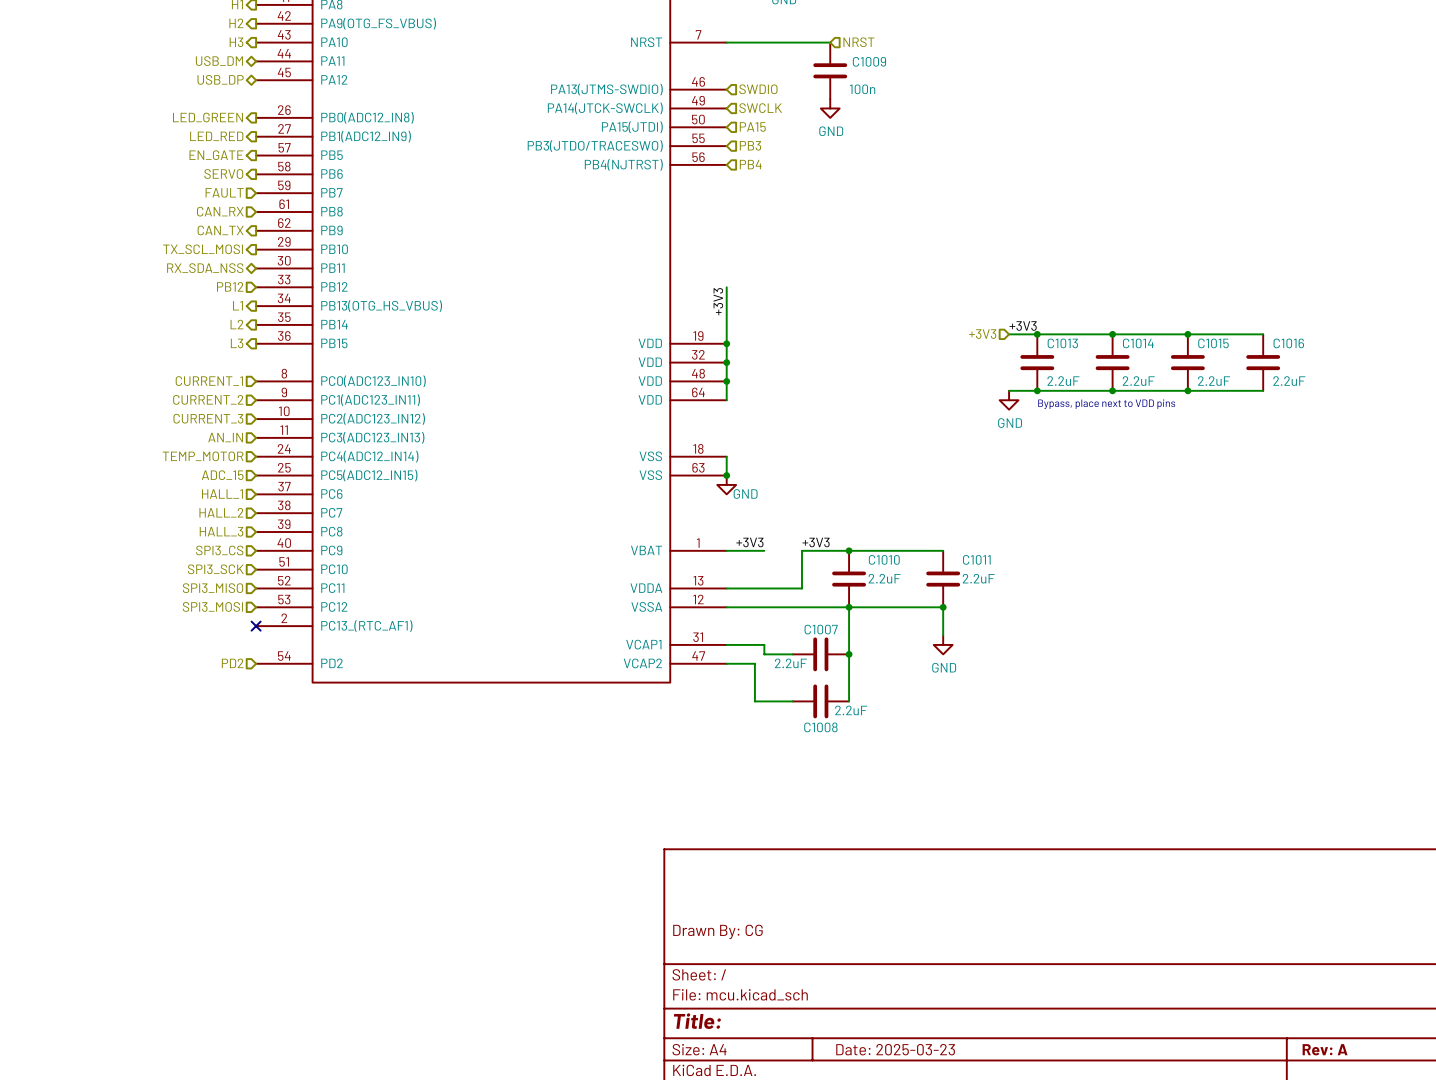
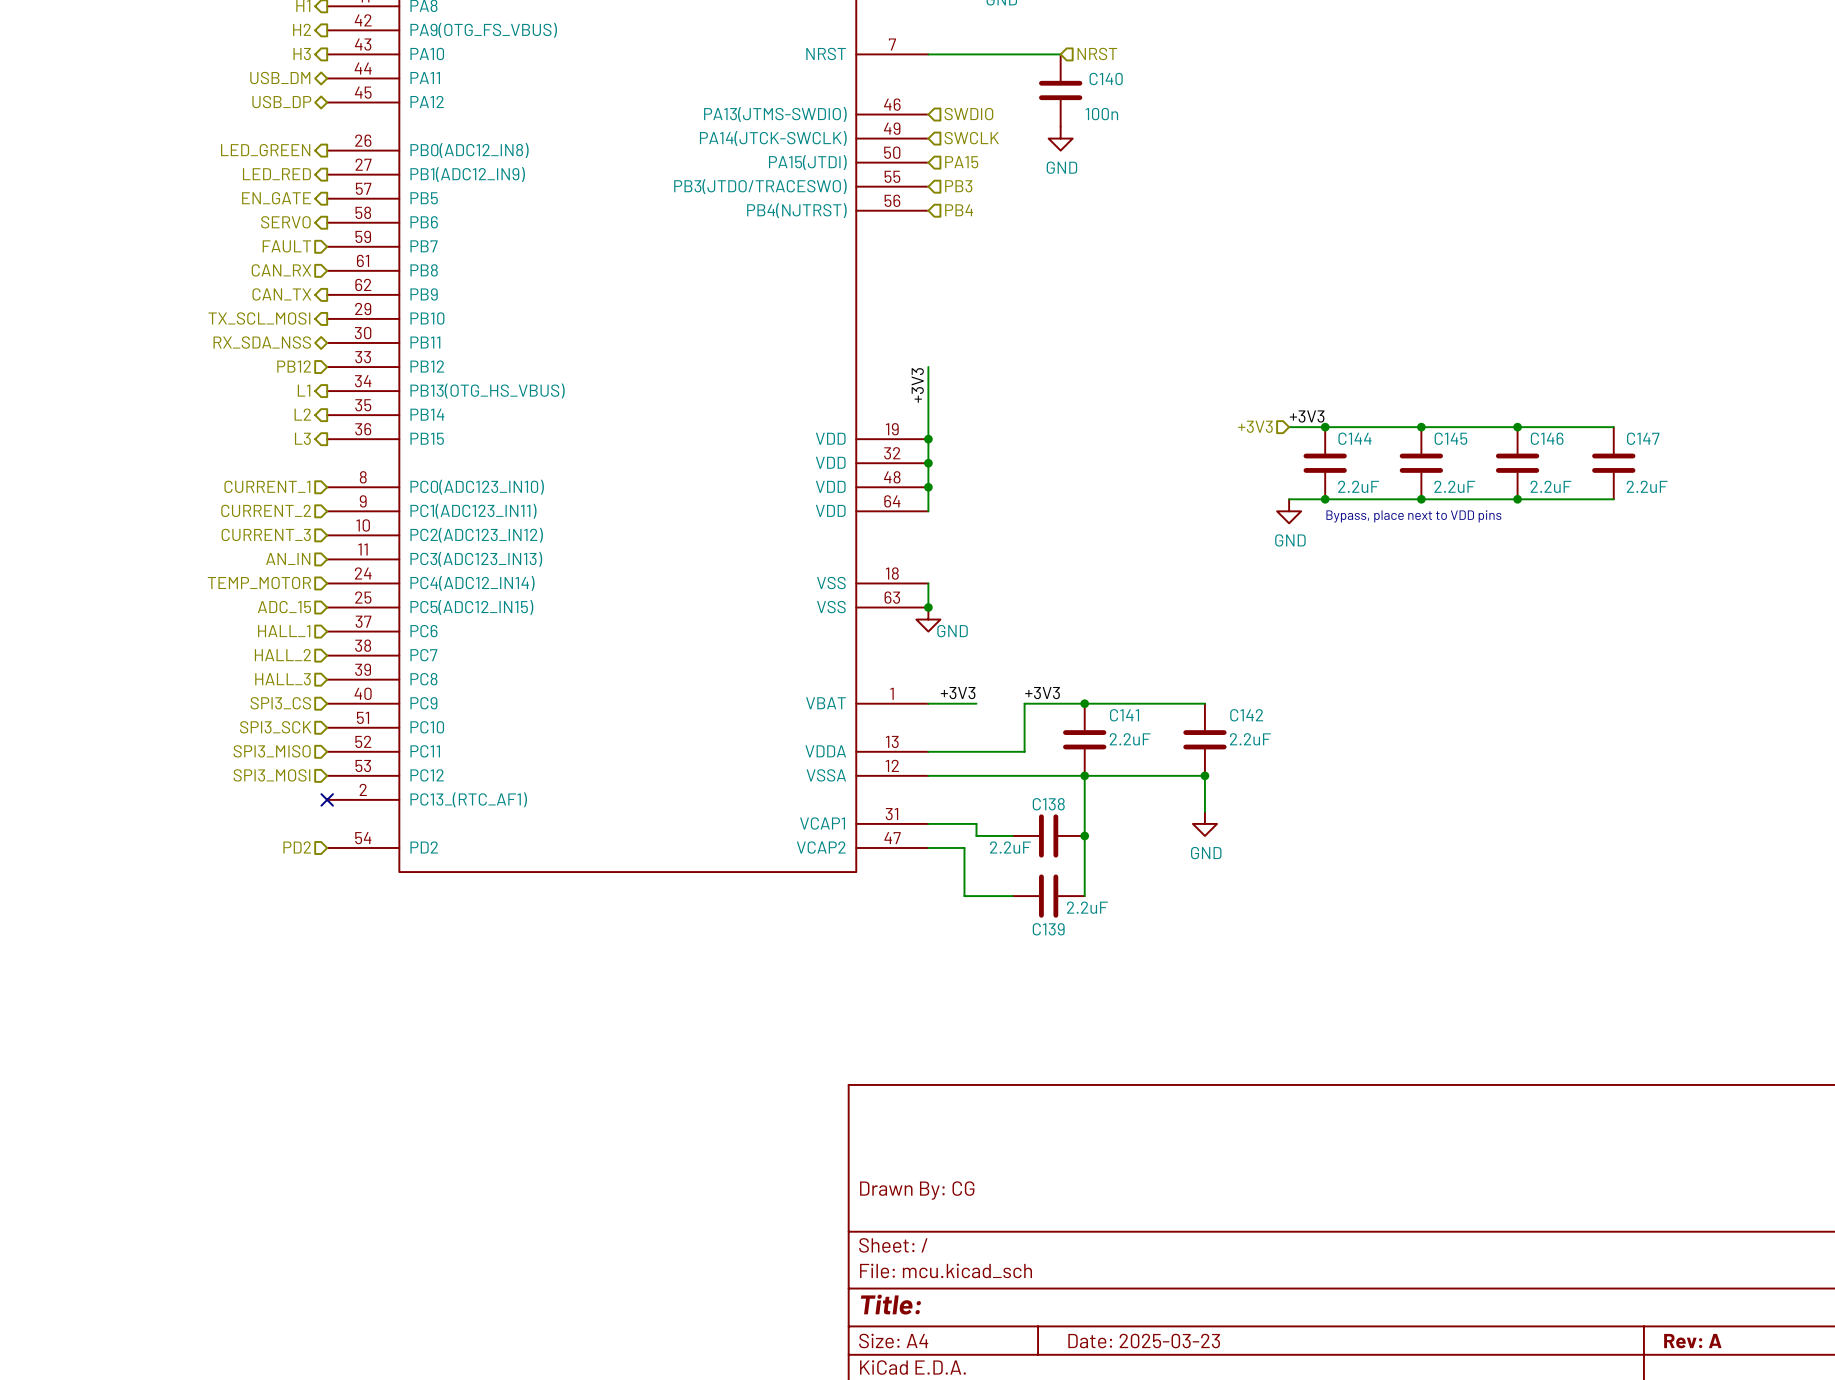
C1009 name: C1009 (869, 61) -> C140 (1106, 78)
C1013 name: C1013 (1062, 343) -> C144 (1354, 438)
C1014 name: C1014 (1138, 343) -> C145 (1450, 438)
C1015 name: C1015 (1213, 343) -> C146 (1547, 438)
C1016 name: C1016 (1288, 343) -> C147 (1643, 438)
C1010 name: C1010 (884, 559) -> C141 (1124, 715)
C1011 name: C1011 (976, 559) -> C142 (1246, 715)
C1007 name: C1007 (821, 629) -> C138 (1048, 804)
C1008 name: C1008 (820, 727) -> C139 (1048, 929)

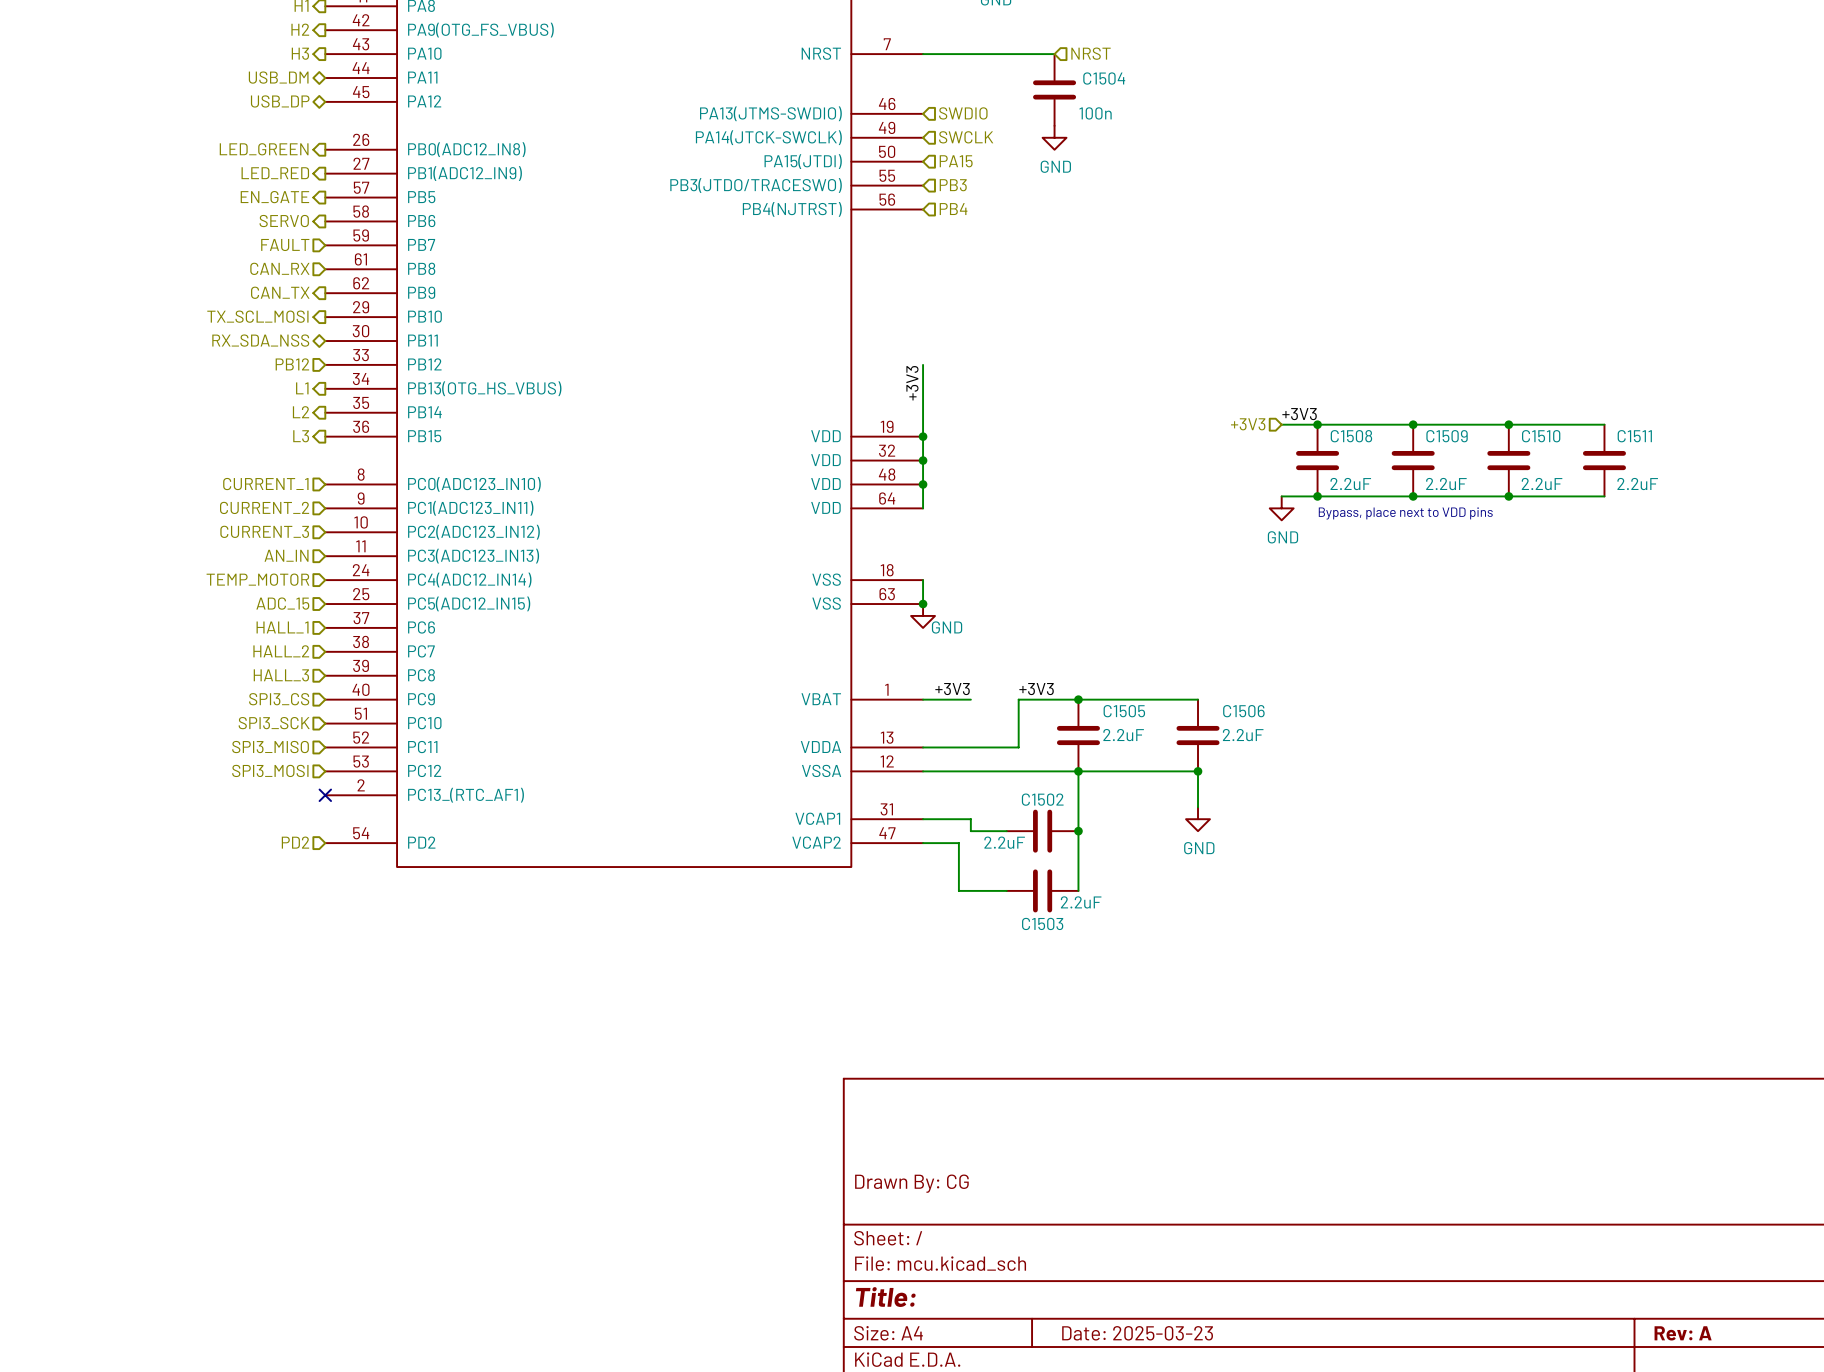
C140 name: C140 (1106, 78) -> C1504 (1104, 78)
C144 name: C144 (1354, 438) -> C1508 (1351, 436)
C145 name: C145 (1450, 438) -> C1509 (1447, 436)
C146 name: C146 (1547, 438) -> C1510 (1541, 436)
C147 name: C147 (1643, 438) -> C1511 (1634, 436)
C141 name: C141 (1124, 715) -> C1505 (1124, 711)
C142 name: C142 (1246, 715) -> C1506 (1243, 711)
C138 name: C138 (1048, 804) -> C1502 (1042, 799)
C139 name: C139 (1048, 929) -> C1503 (1042, 923)

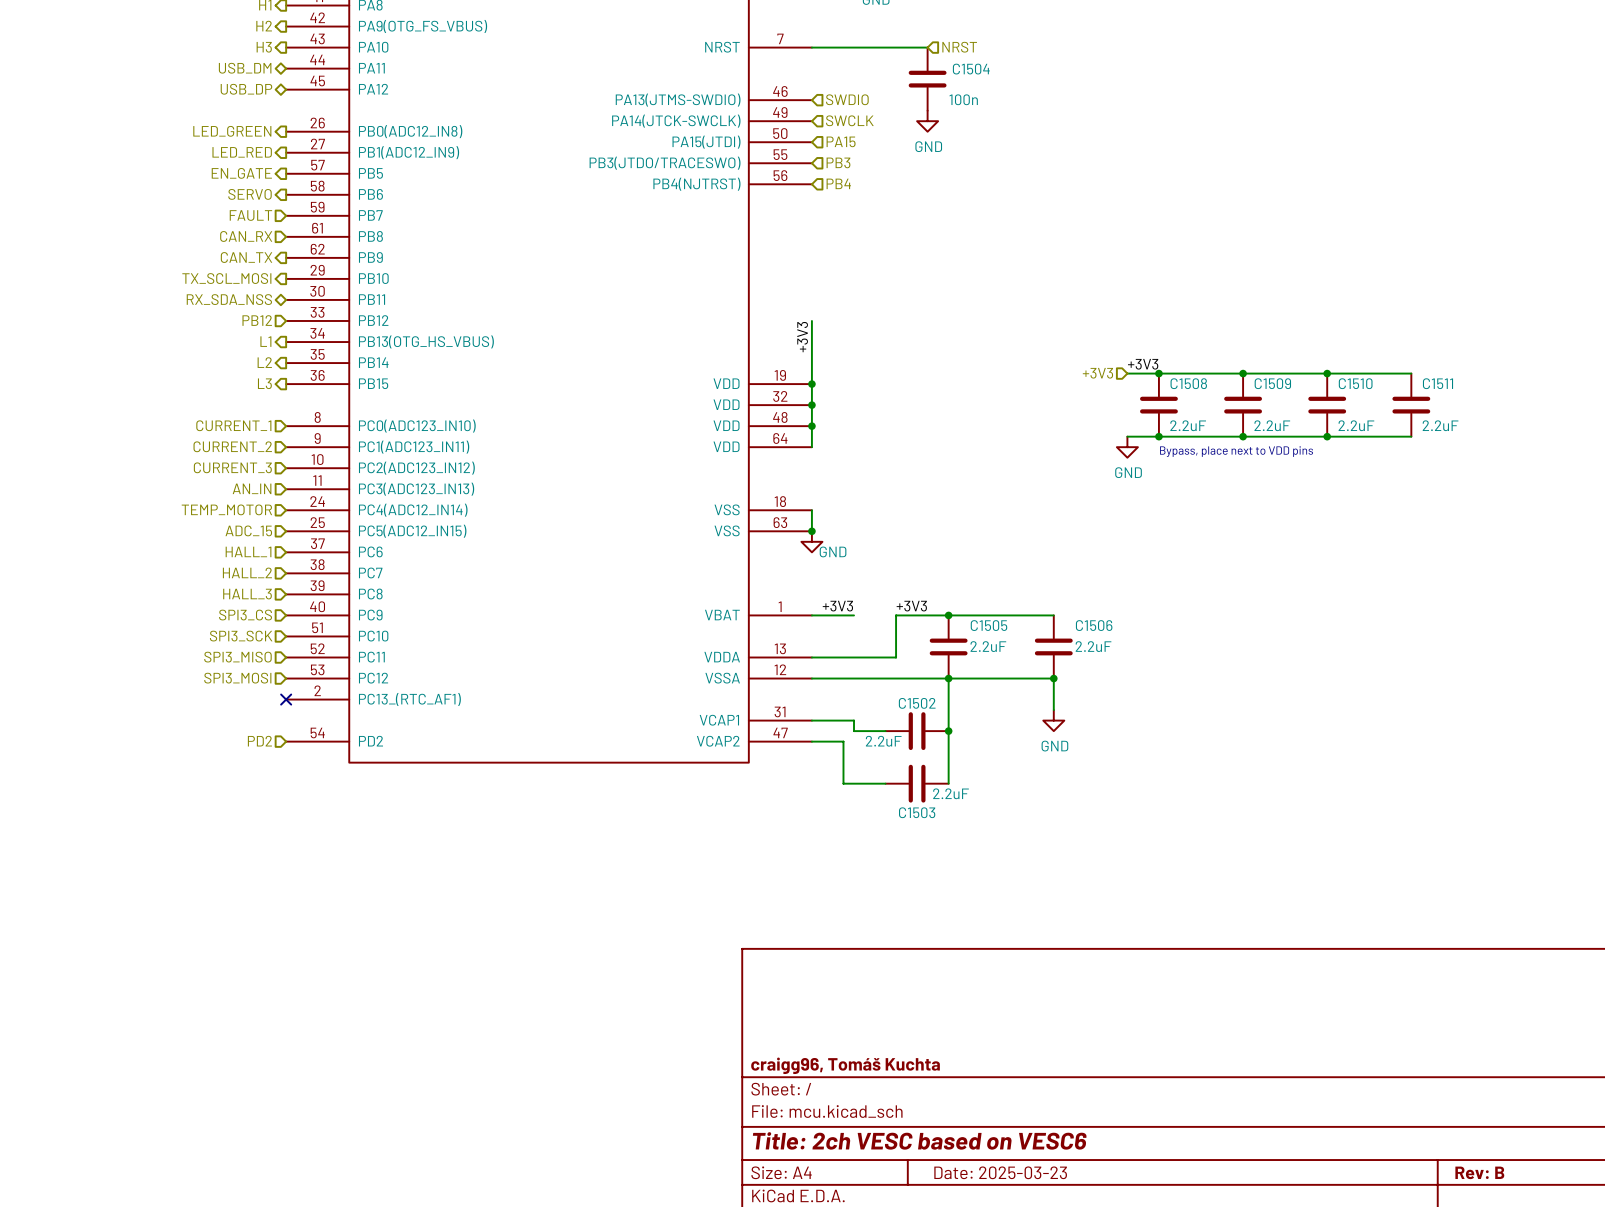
title block: Drawn By: CG (911, 1183) -> none
title block: none -> craigg96, Tomáš Kuchta (845, 1065)
title block: Title: (885, 1297) -> Title: 2ch VESC based on VESC6 (919, 1140)
title block: Rev: A (1683, 1333) -> Rev: B (1479, 1172)

